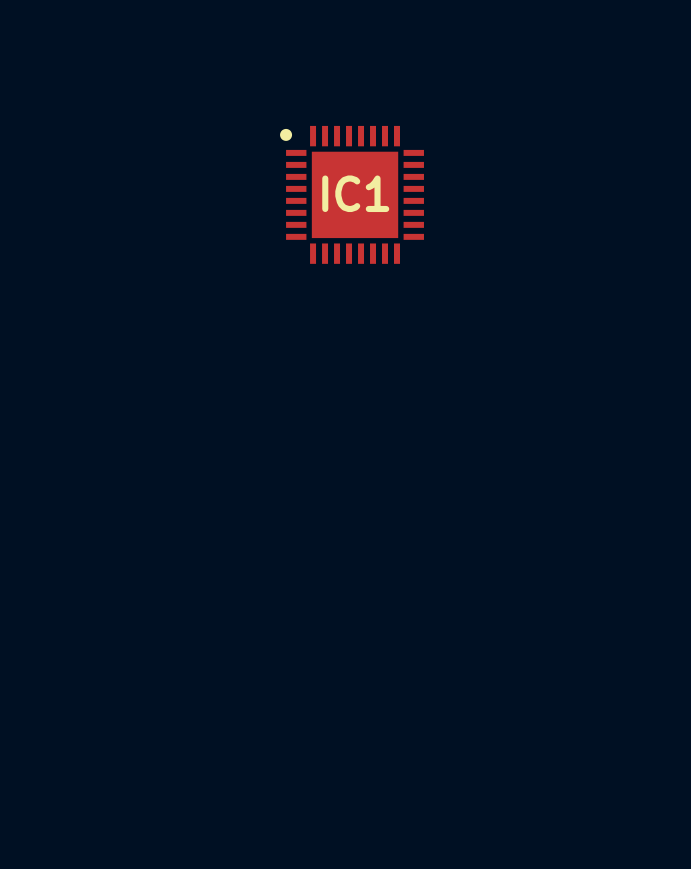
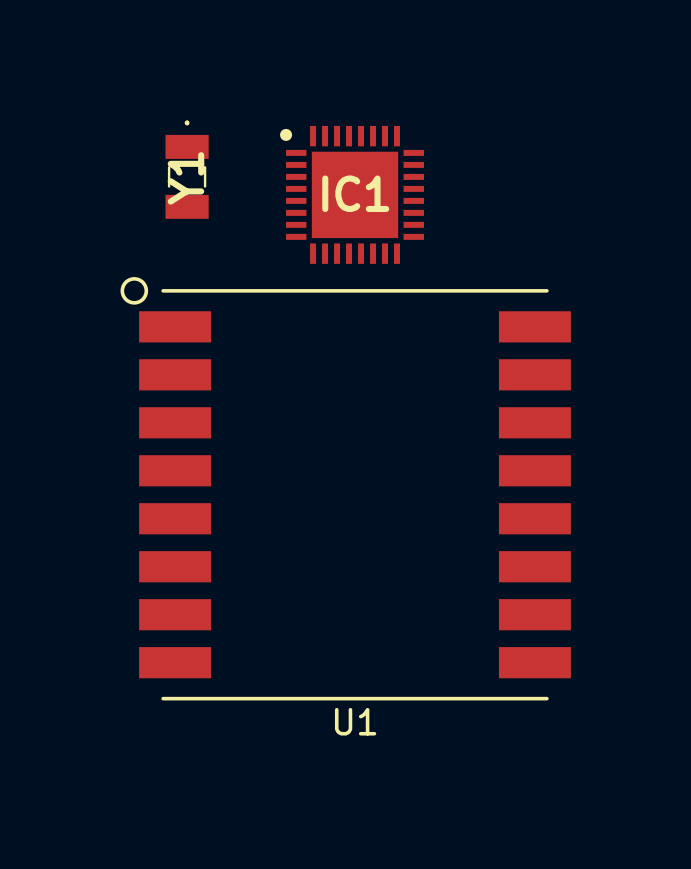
Y1: none -> (187, 169)
U1: none -> (345, 488)

